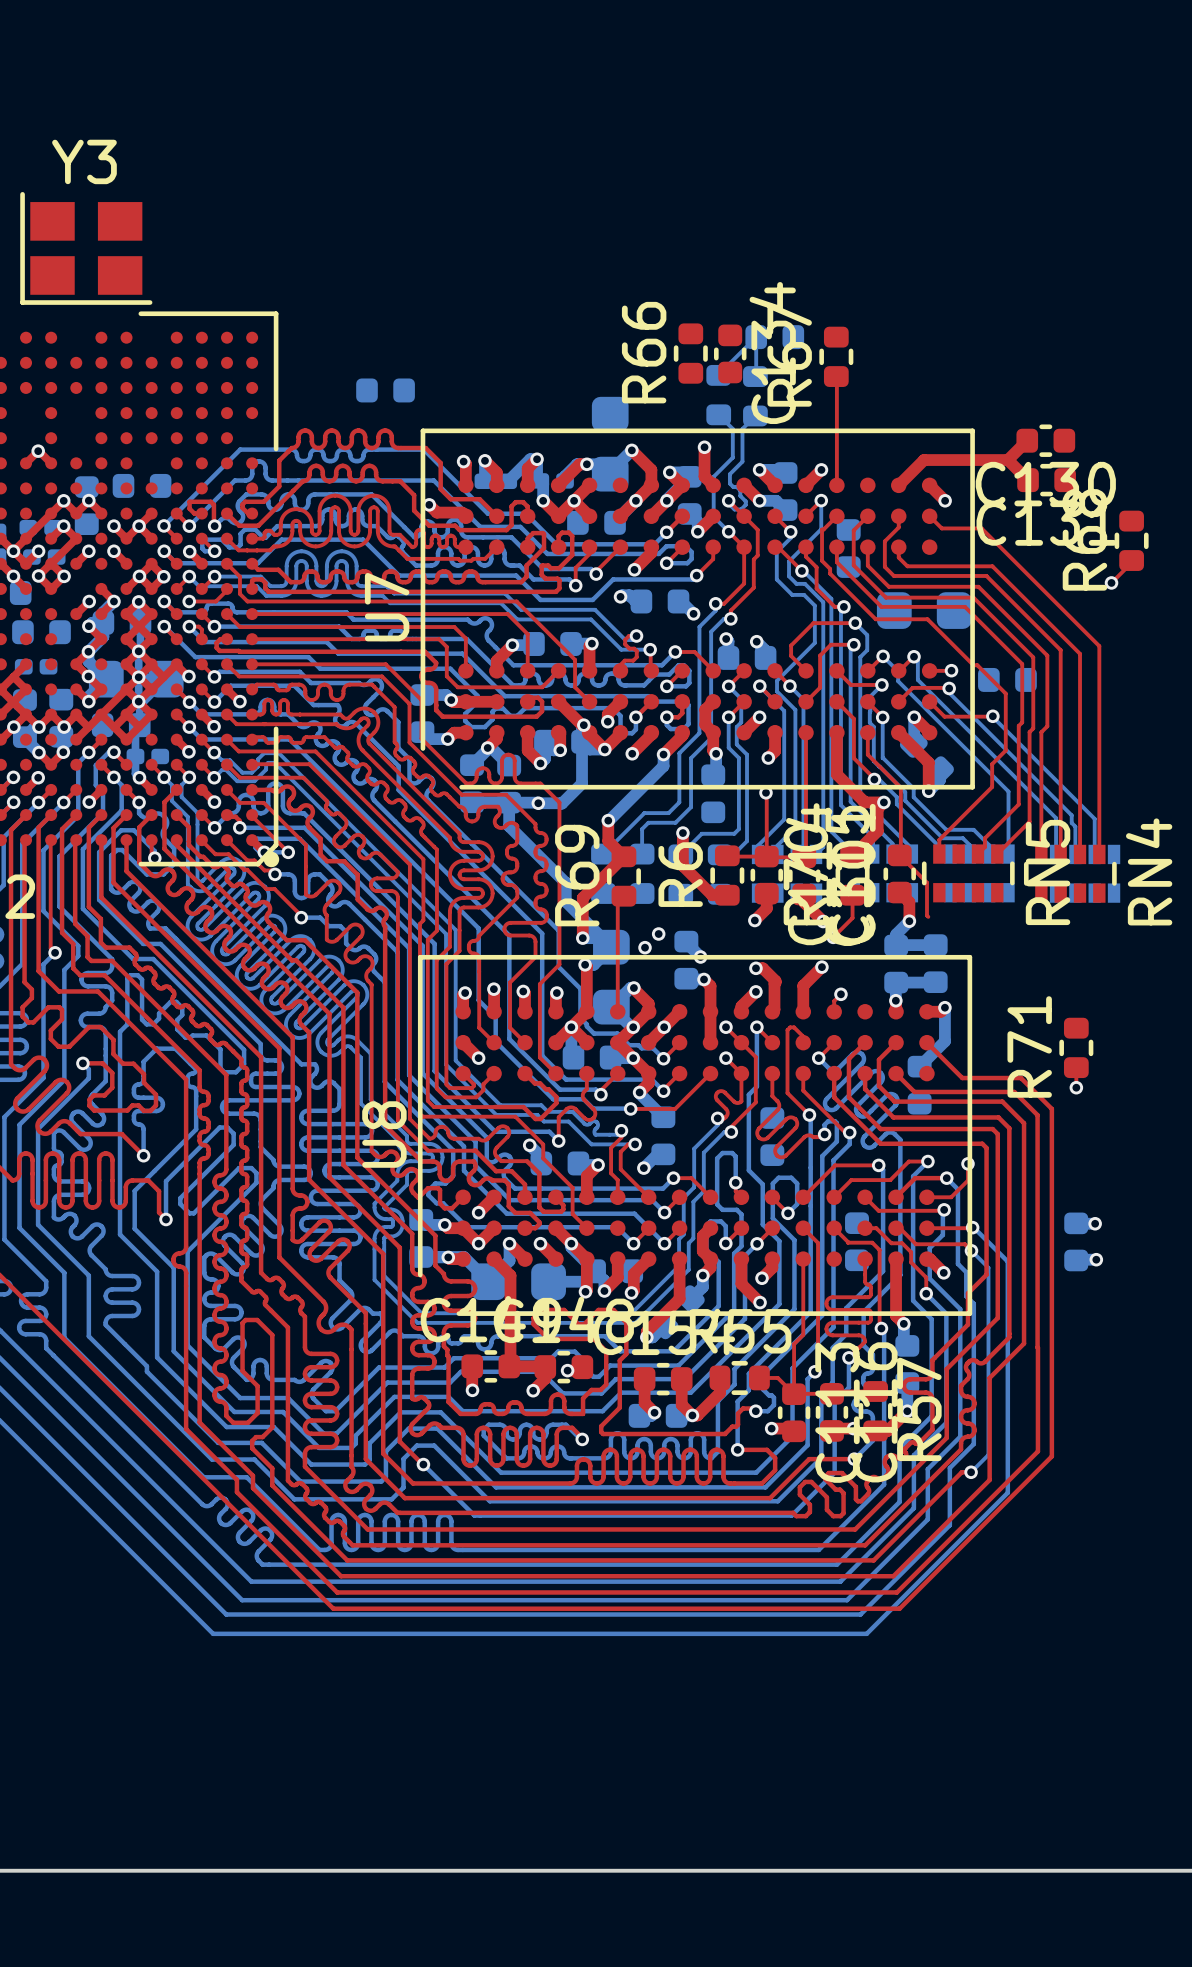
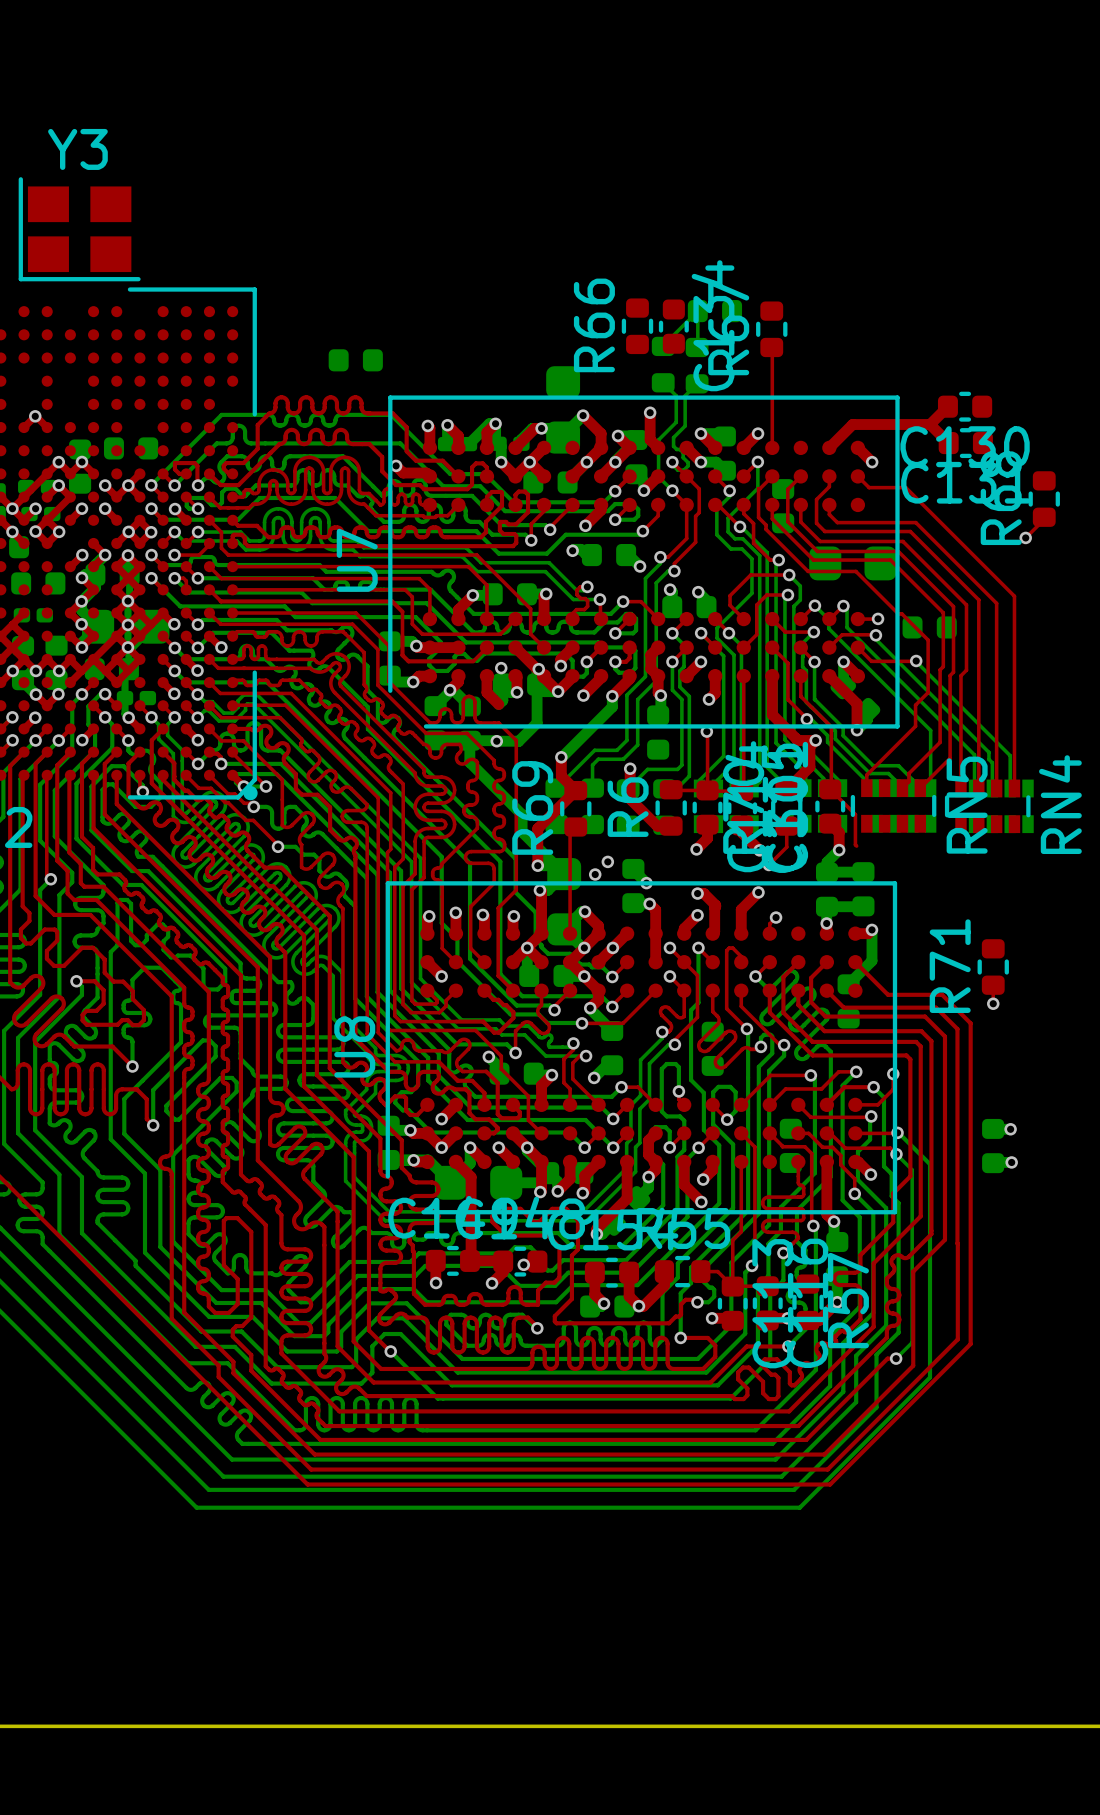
top track: (227, 639) (220, 639) (216, 642) (216, 647) (219, 650) (238, 650) -> (209, 589) (221, 601)
top track: (436, 662) (434, 667) (424, 670) (421, 676) (423, 680) (432, 683) (436, 689) -> (402, 611) (402, 636)
top track: (527, 701) (531, 697) (538, 697) (542, 701) (542, 711) (536, 716) (512, 716) -> (486, 647) (473, 661)
via position: (540, 763) -> (501, 668)

